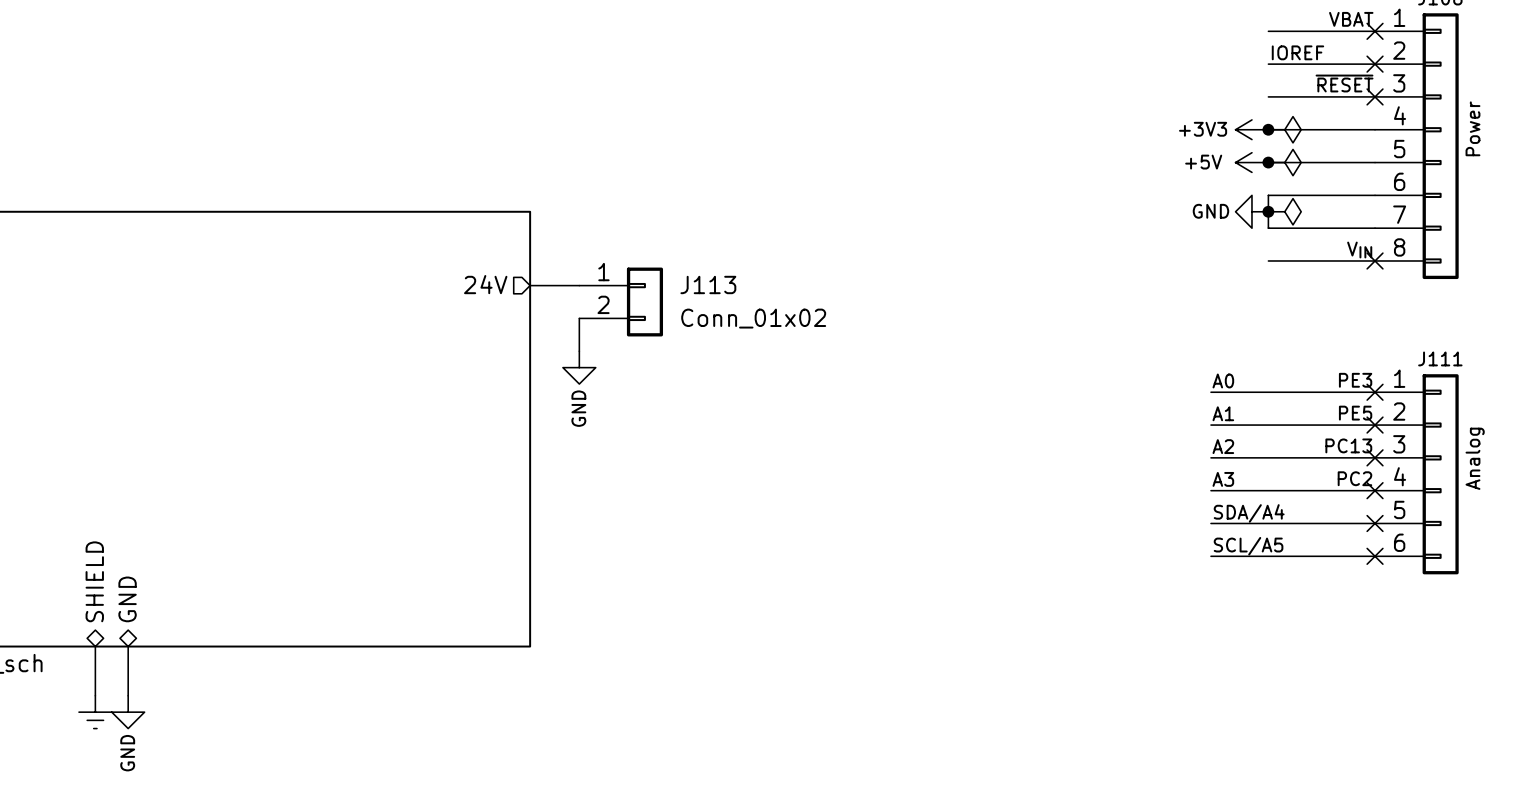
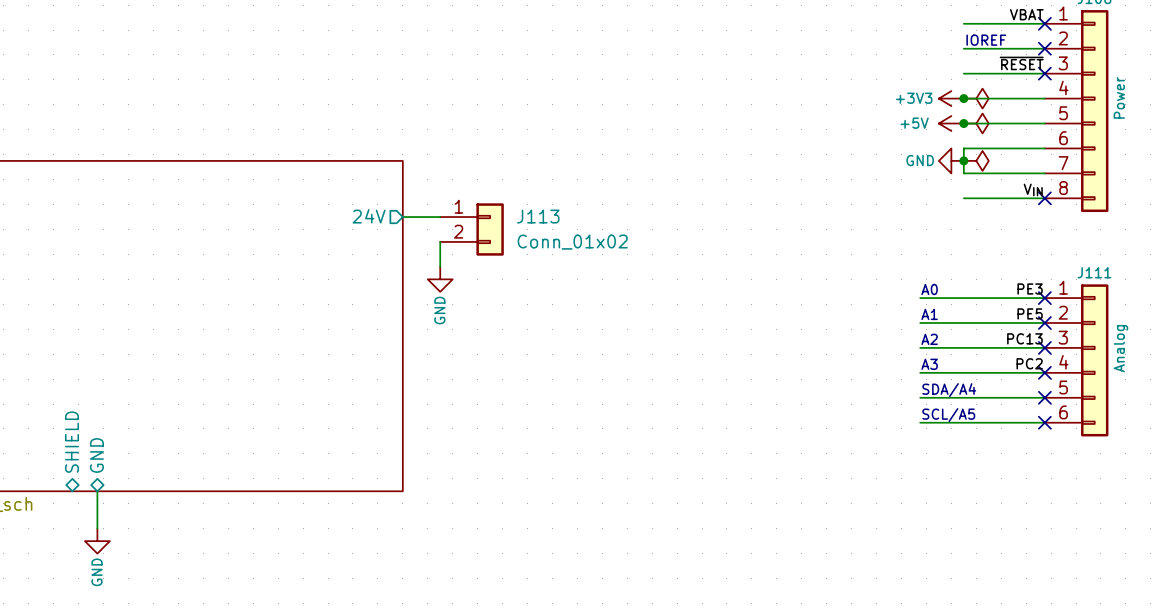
wire: (95, 646) (95, 695) -> none
power symbol: (95, 712) -> none

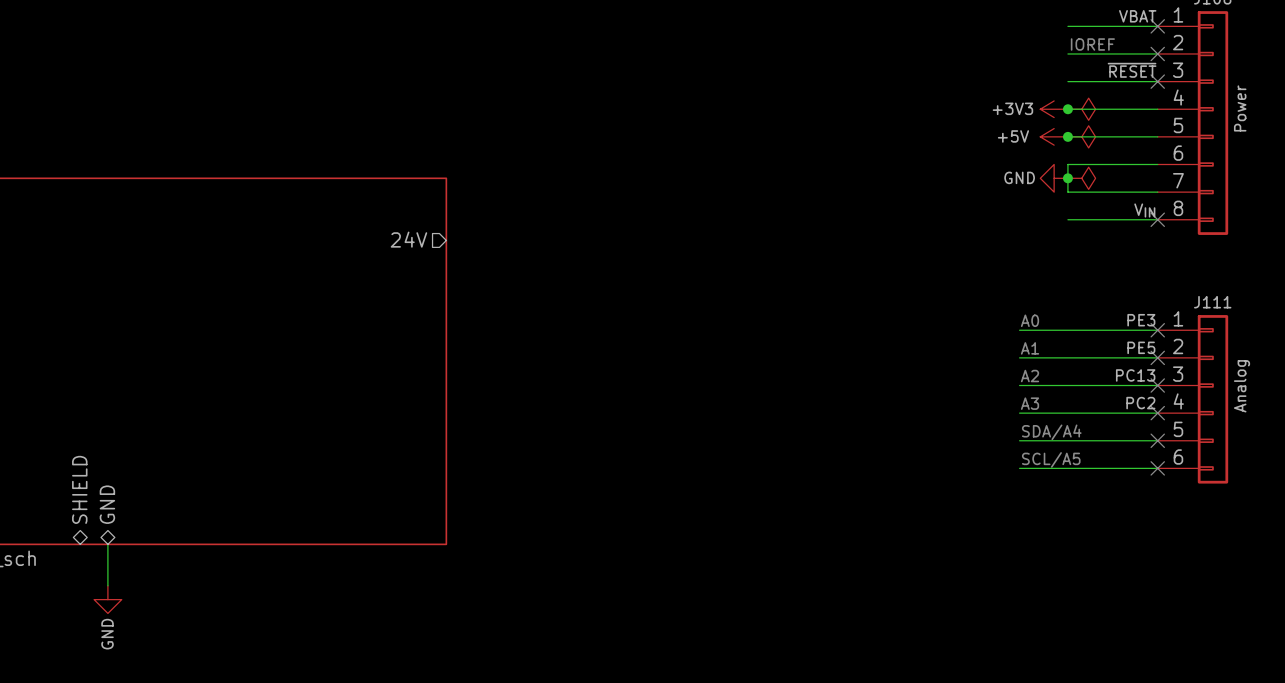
wire: (402, 217) (440, 217) -> none
J113: Conn_01x02 (472, 229) -> none
wire: (440, 241) (440, 266) -> none
power symbol: GND (440, 279) -> none

